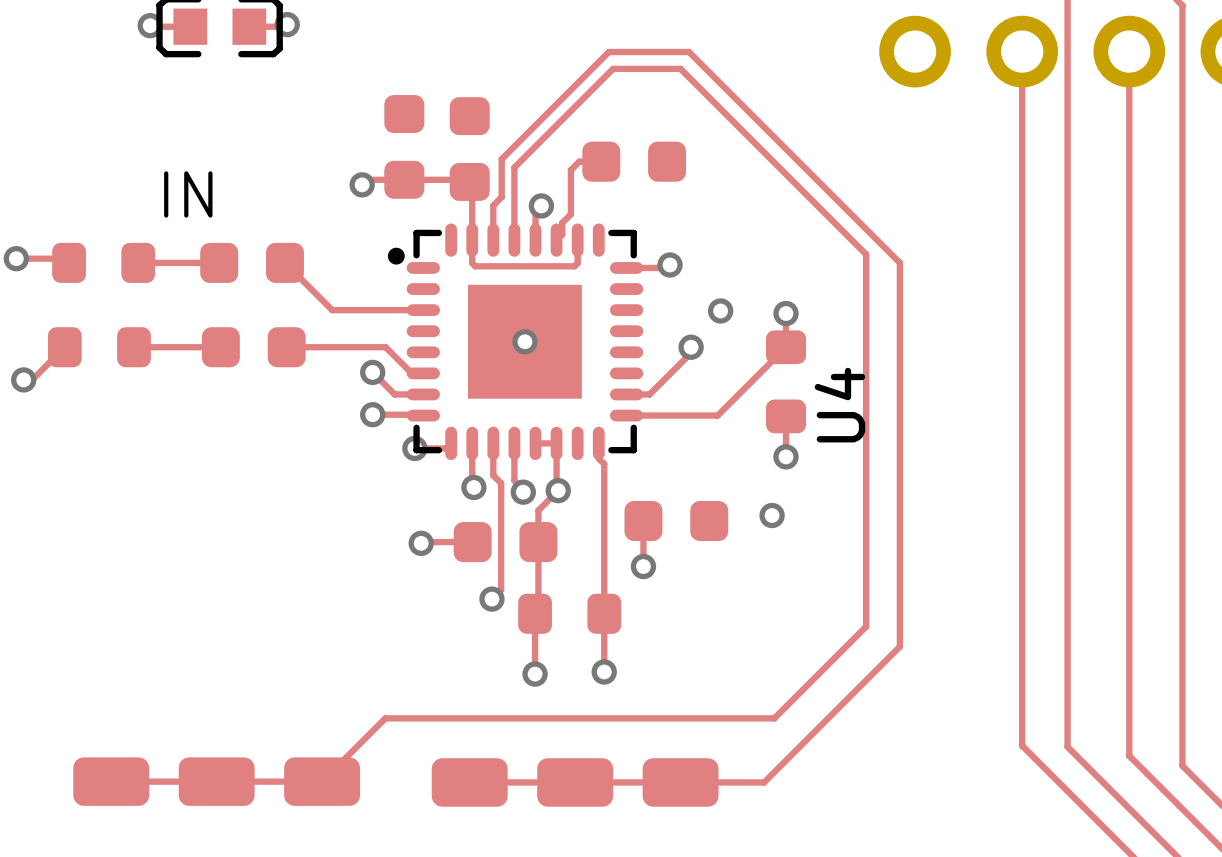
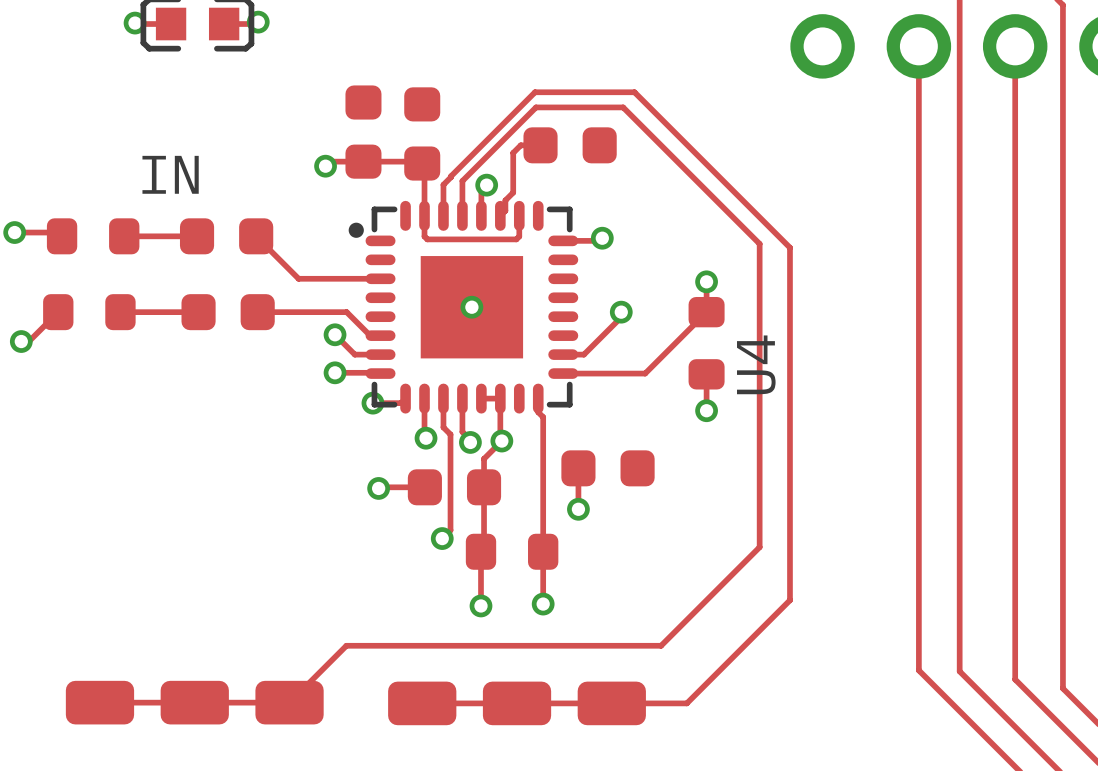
track: (501, 196) (501, 159) (608, 52) (689, 52) (899, 262) (899, 646) (878, 667) -> (451, 176) (535, 92) (634, 92) (789, 247) (789, 600)
track: (514, 201) (514, 167) (613, 68) (680, 68) (866, 254) (866, 626) (774, 718) (735, 718) -> (462, 181) (536, 107) (623, 107) (759, 243) (759, 547) (661, 645)
via: (720, 310) -> none
via: (772, 515) -> none

